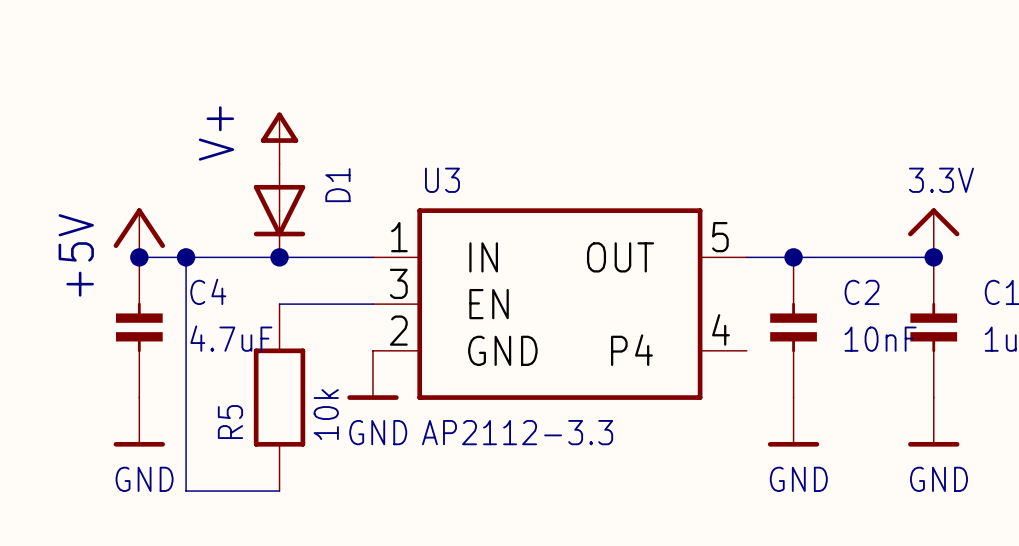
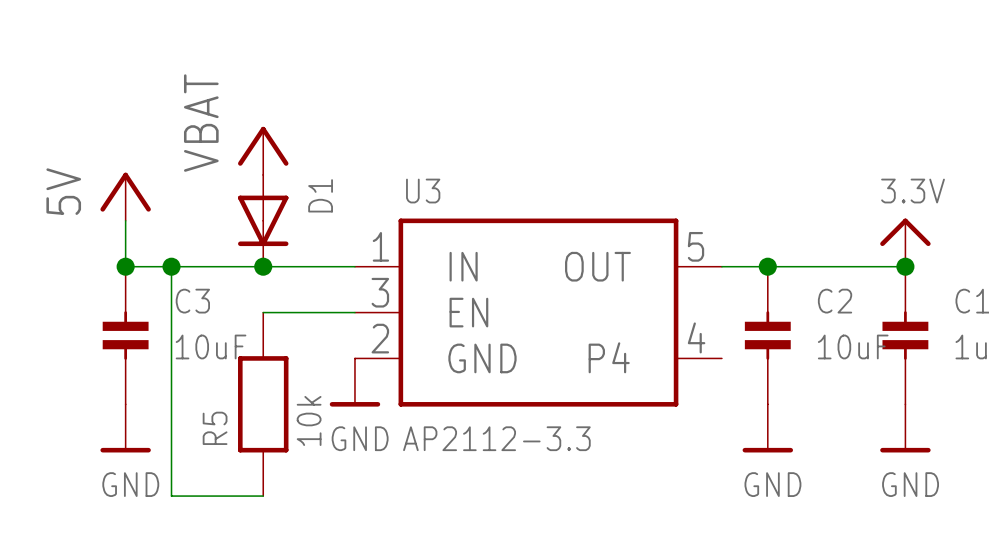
power symbol: V+ (279, 138) -> VBAT (263, 150)
power symbol: none -> 5V (125, 196)
power symbol: +5V (139, 232) -> none
C4 name: C4 (208, 291) -> C3 (192, 301)
C4 value: 4.7uF (231, 338) -> 10uF (211, 346)
C2 value: 10nF (880, 339) -> 10uF (853, 346)

